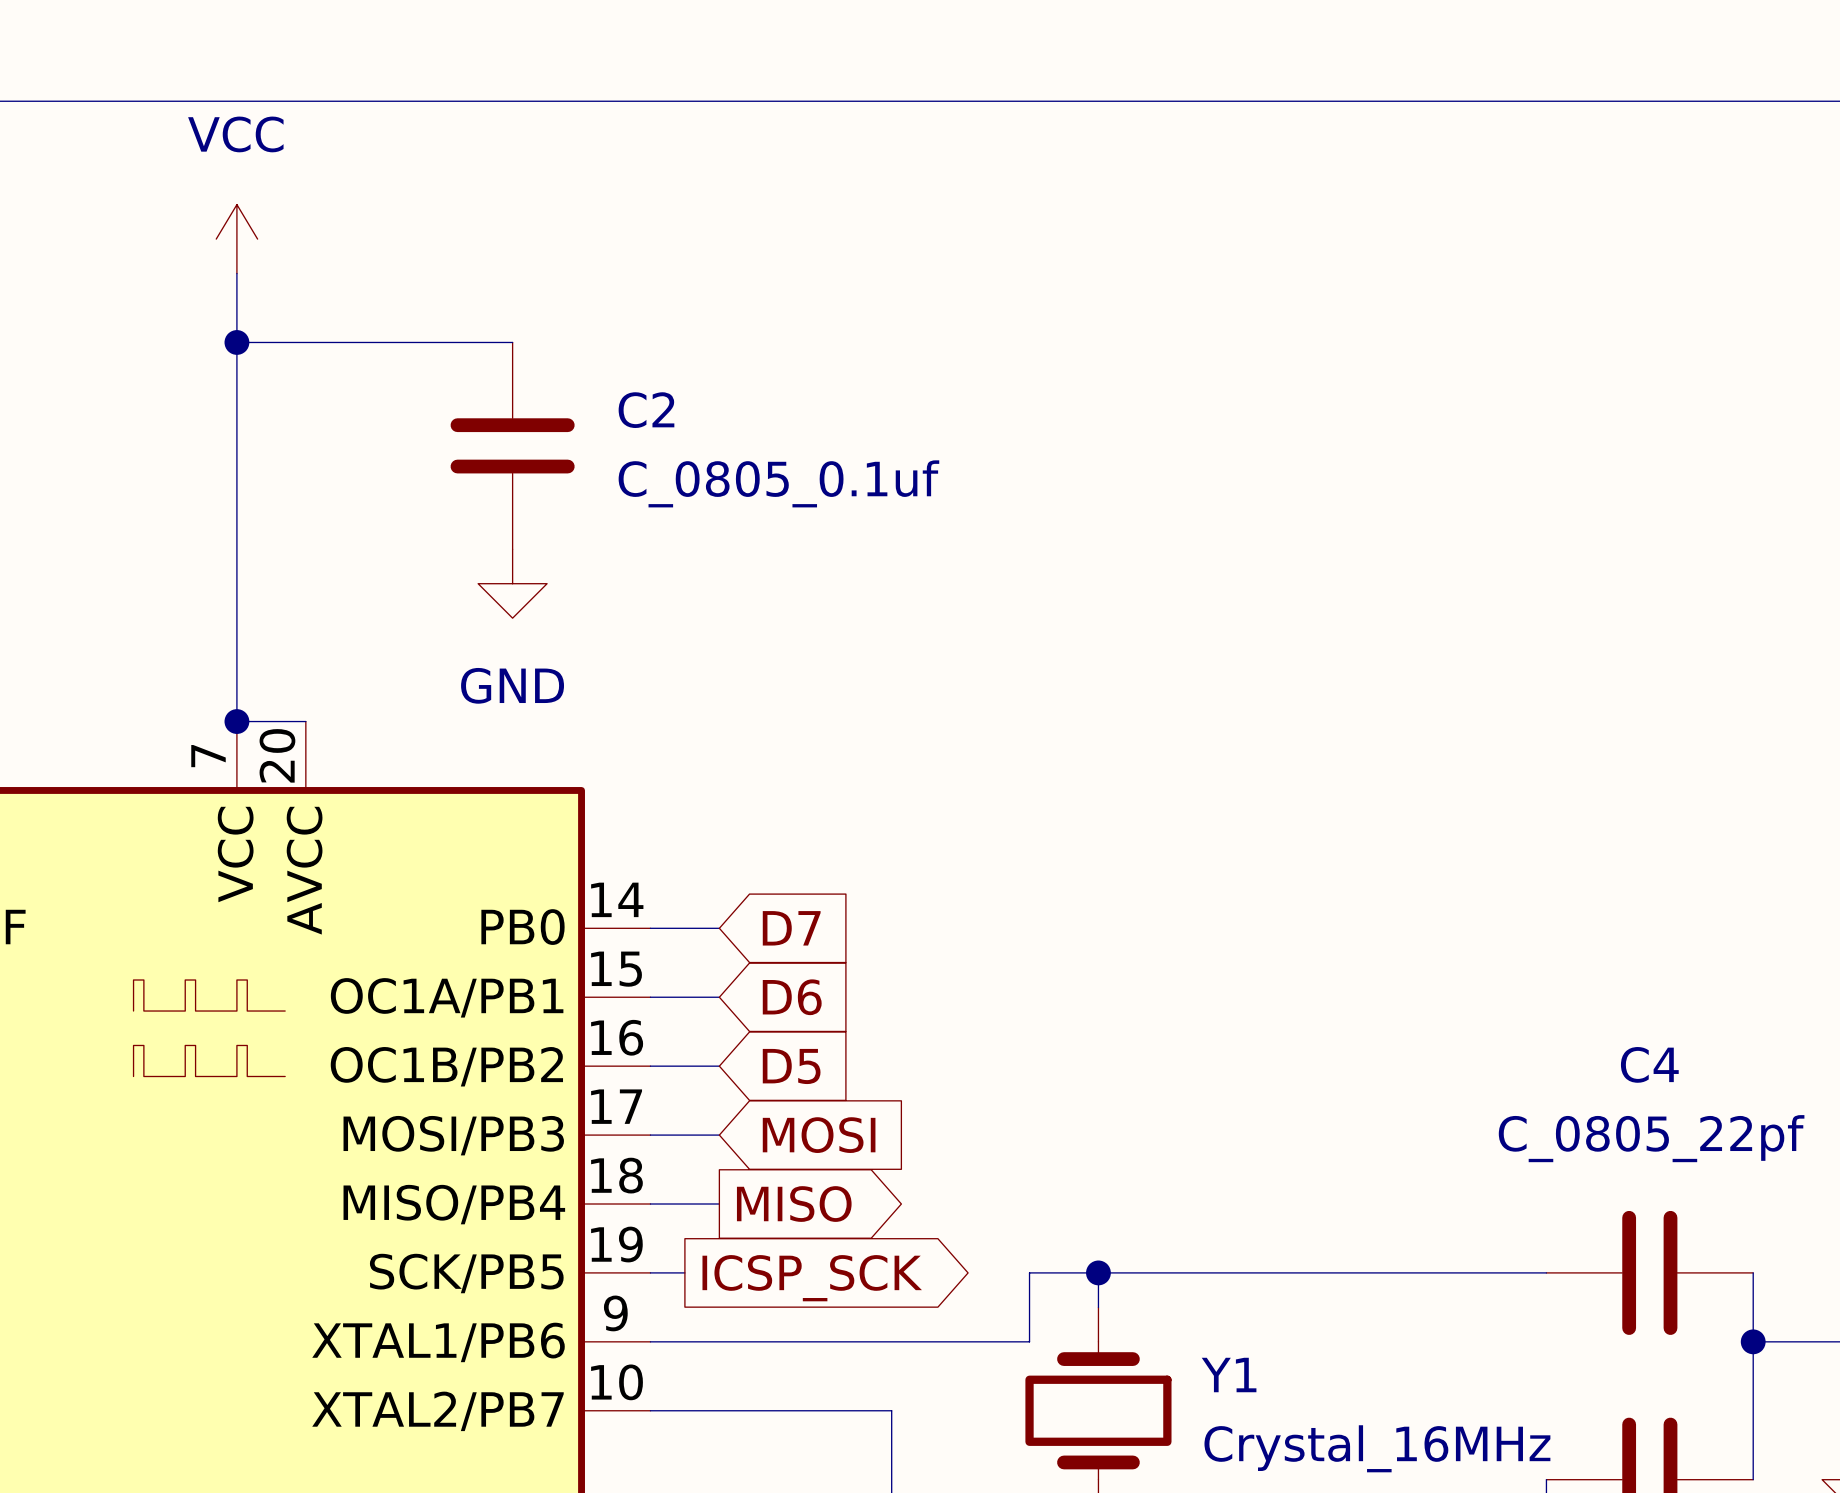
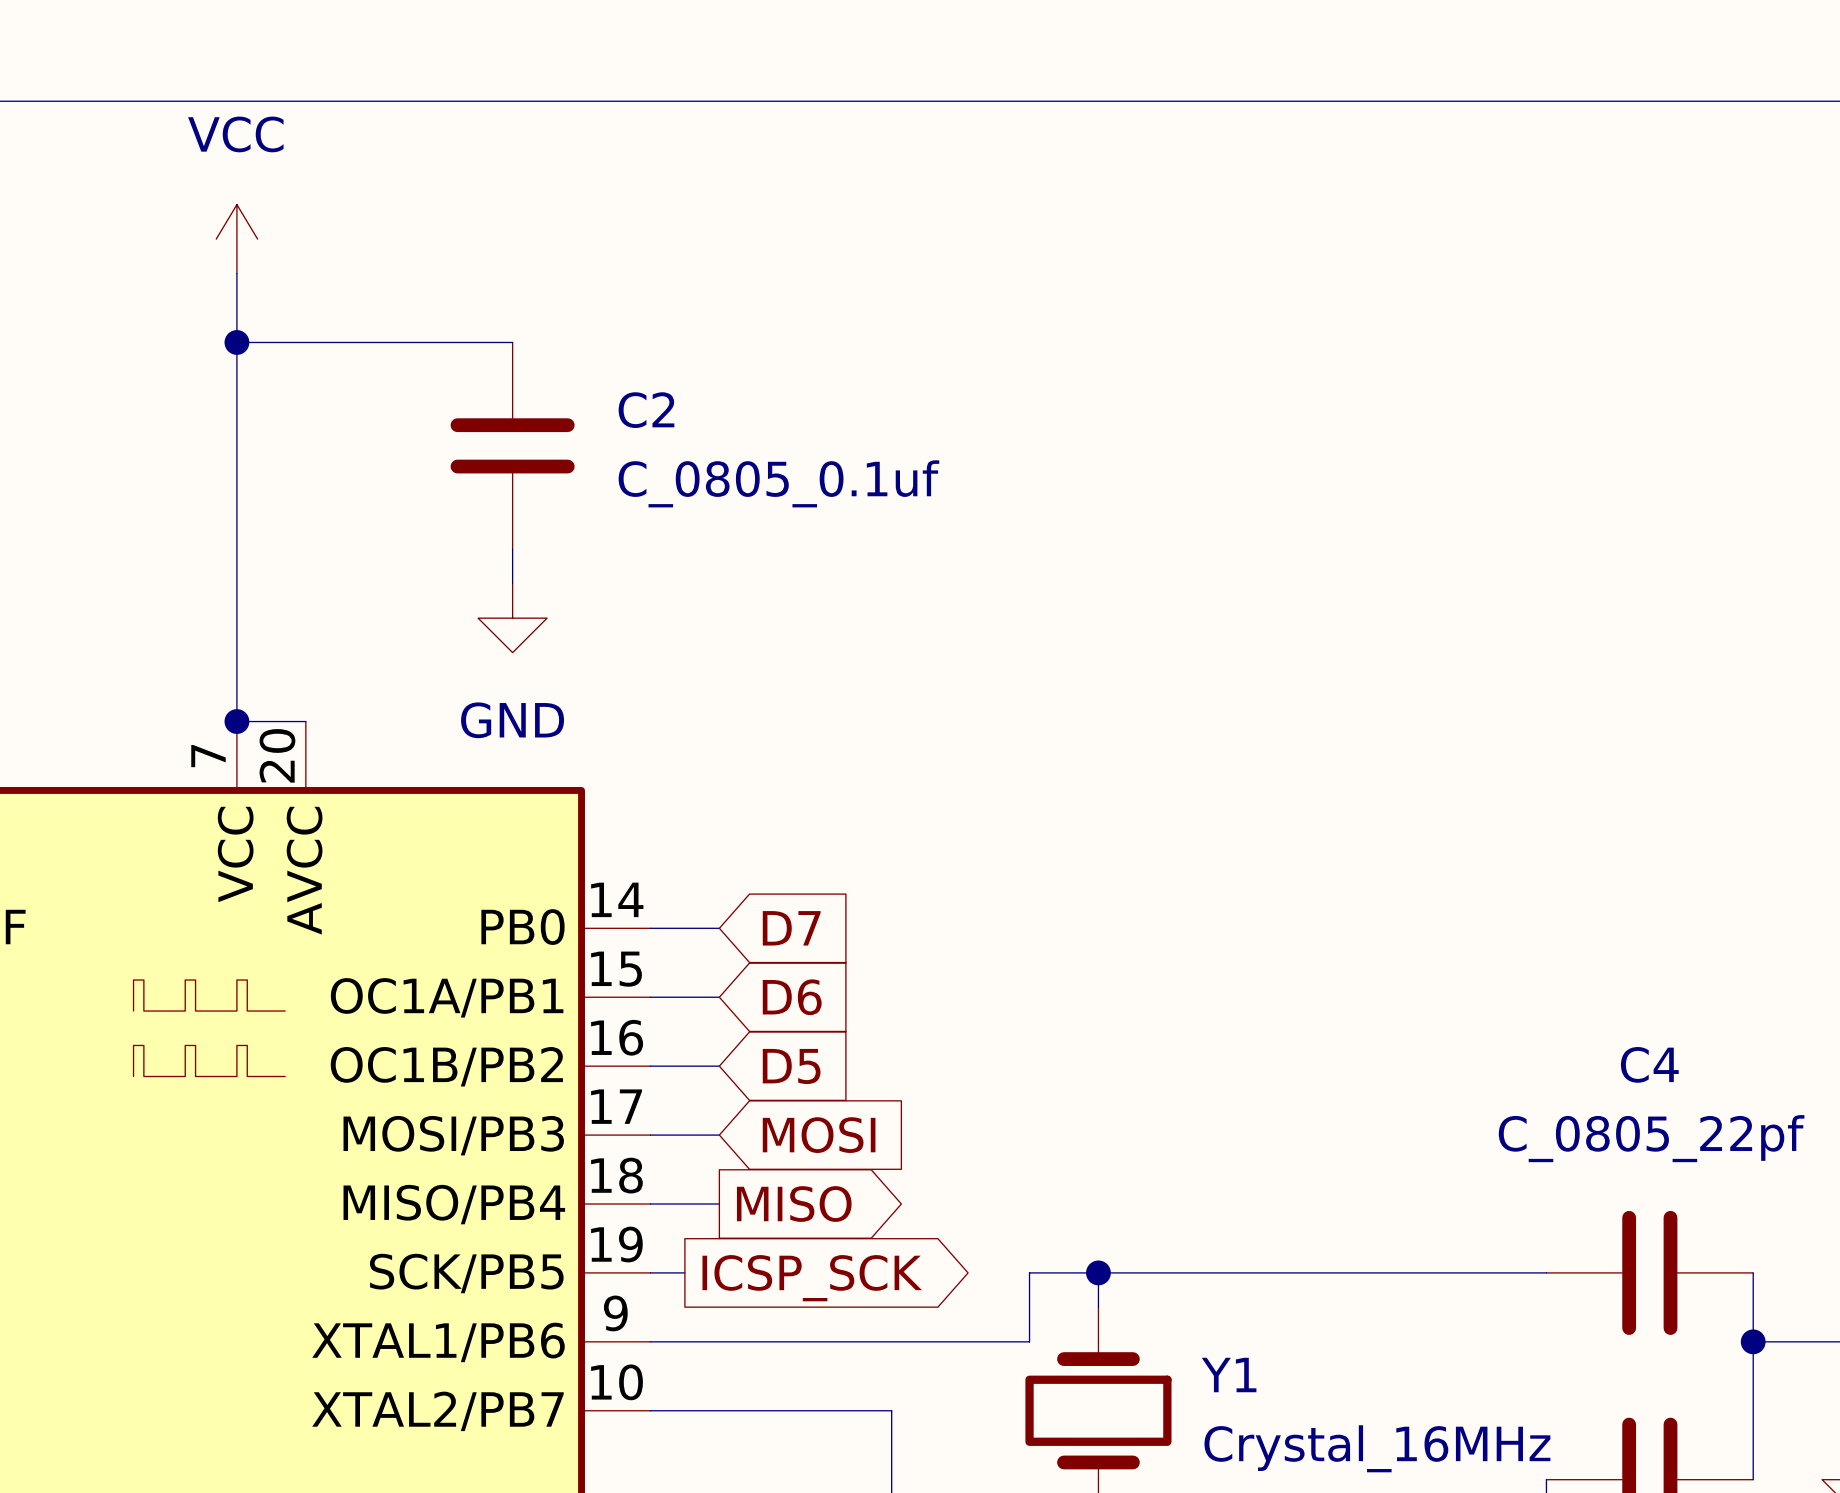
power symbol position: GND (512, 583) -> GND (512, 618)

